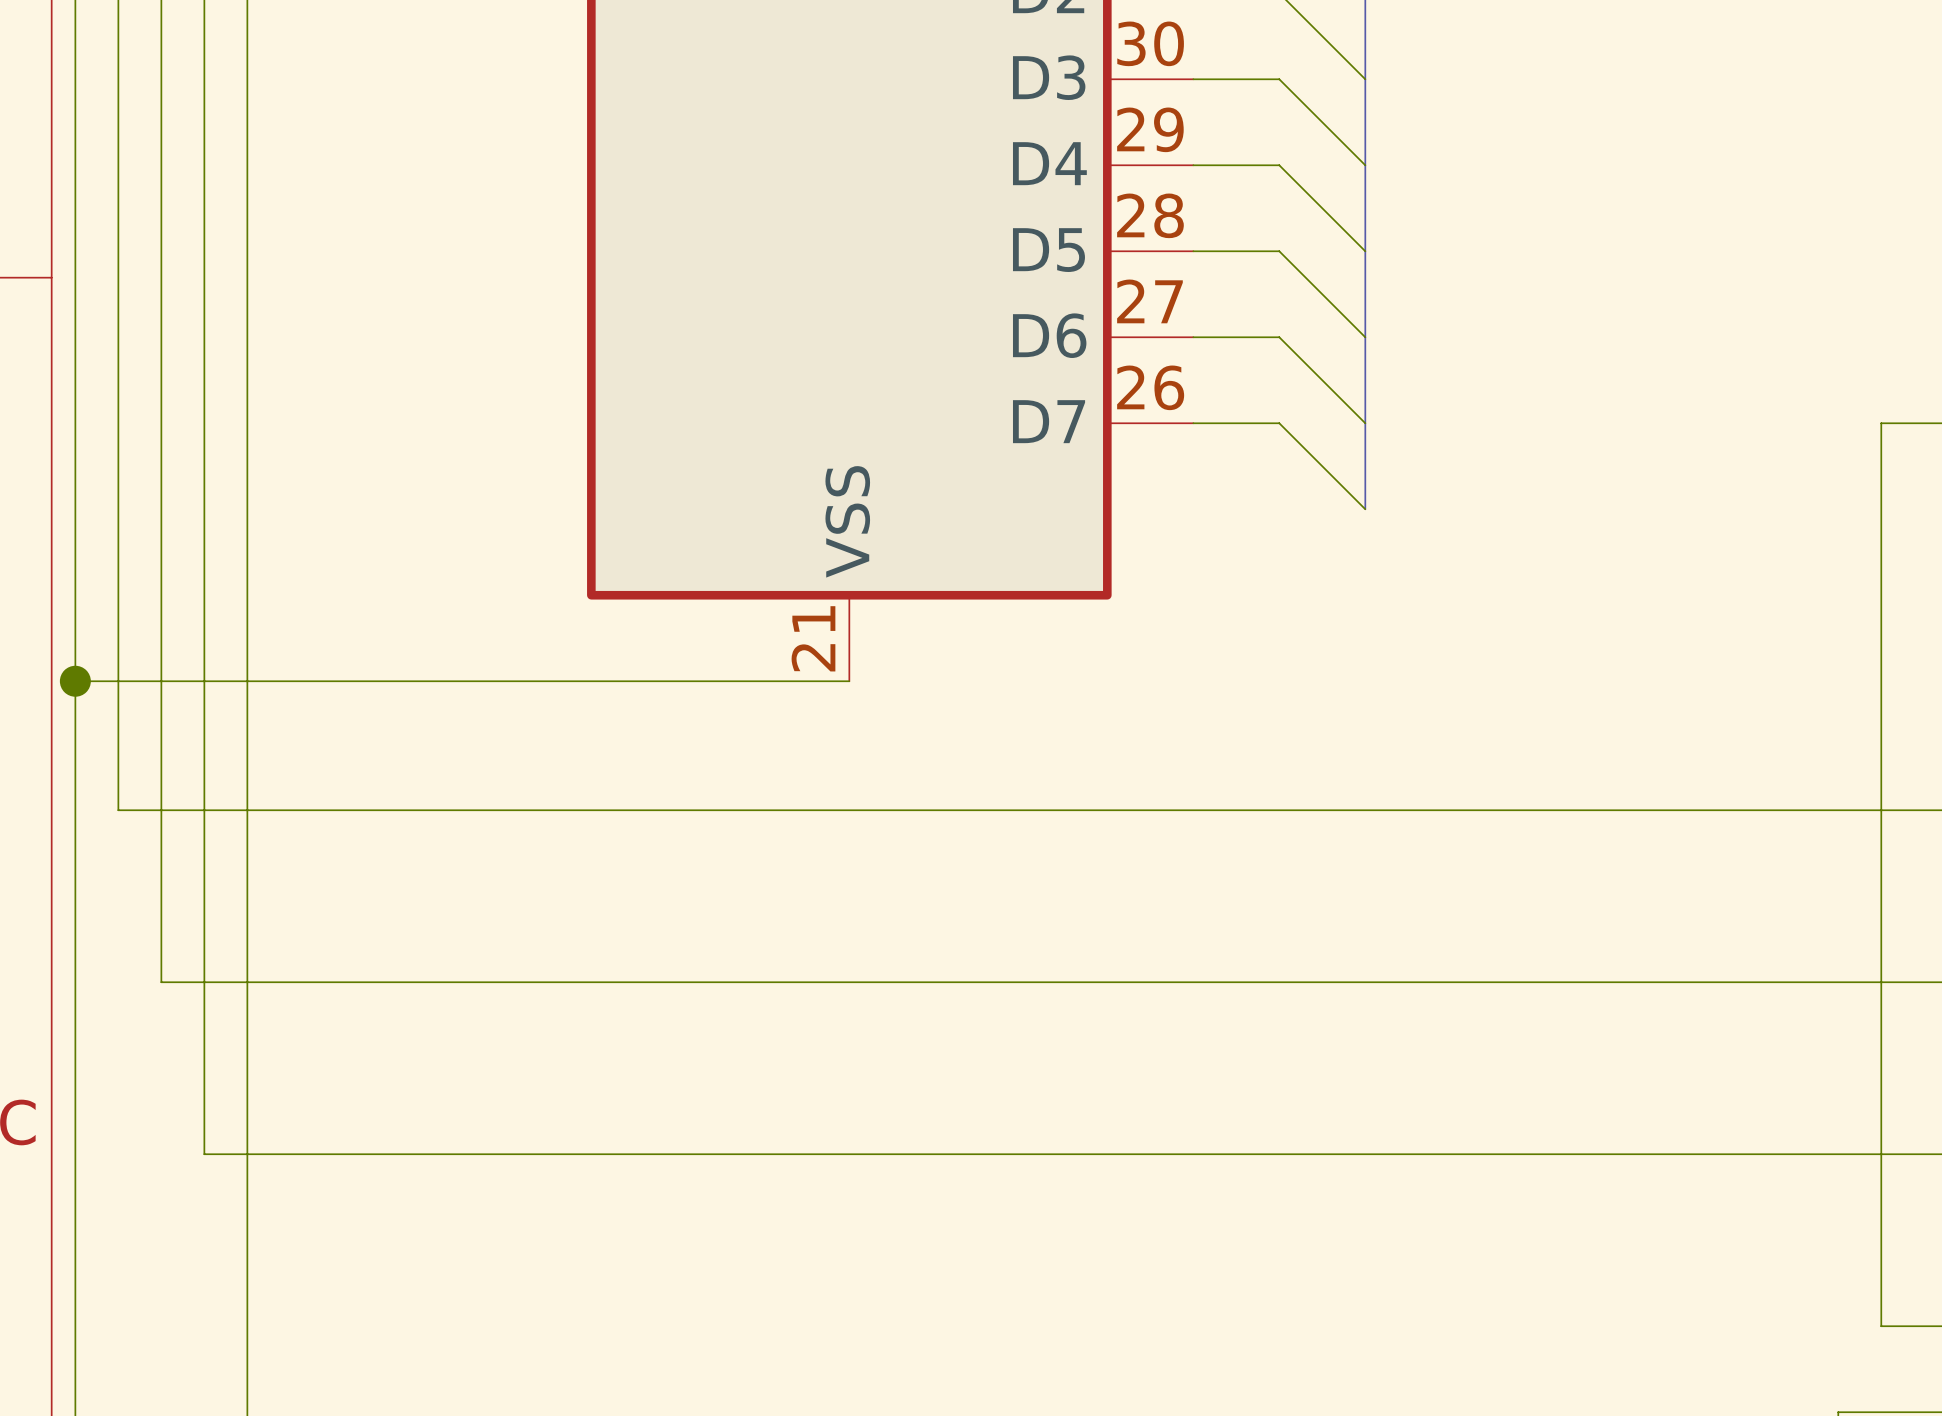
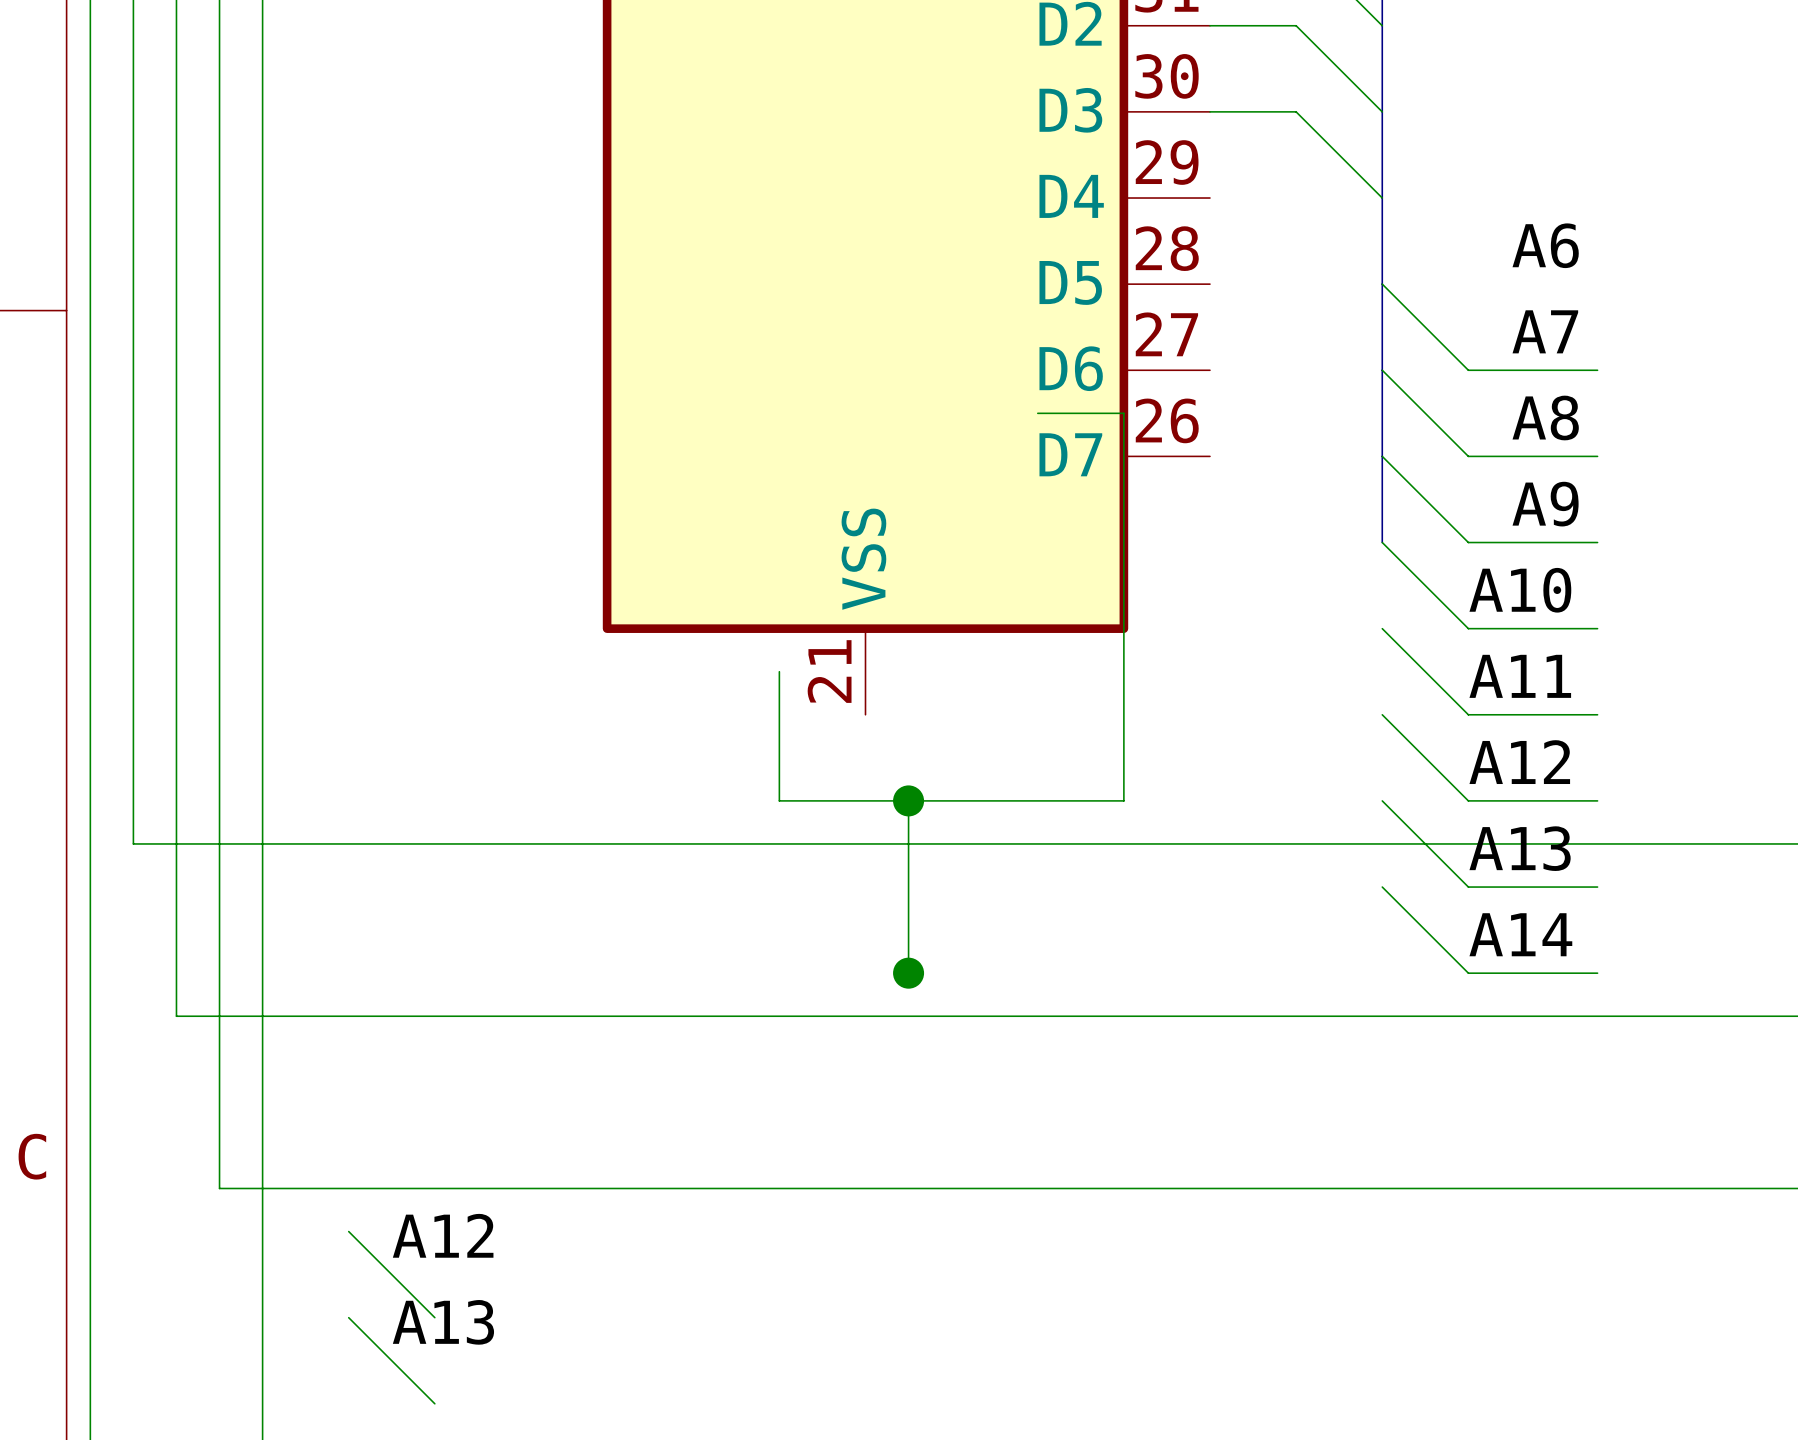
wire: (1193, 165) (1279, 165) (1365, 251) -> (1597, 370) (1468, 370) (1382, 284)
label: none -> A6 (1545, 245)
wire: (1193, 251) (1279, 251) (1365, 337) -> (1597, 456) (1468, 456) (1382, 370)
label: none -> A7 (1545, 331)
wire: (1193, 337) (1279, 337) (1365, 423) -> (1597, 542) (1468, 542) (1382, 456)
wire: none -> (1037, 413) (1123, 413) (1123, 800) (779, 800) (779, 671)
label: none -> A8 (1545, 418)
wire: (1193, 423) (1279, 423) (1365, 509) -> (1597, 628) (1468, 628) (1382, 542)
label: none -> A9 (1545, 504)
label: none -> A10 (1520, 590)
wire: none -> (1382, 628) (1468, 714) (1597, 714)
label: none -> A11 (1520, 676)
wire: (75, 681) (849, 681) -> none
junction: (75, 681) -> none
wire: none -> (1382, 714) (1468, 800) (1597, 800)
label: none -> A12 (1519, 762)
wire: none -> (908, 800) (908, 973)
junction: none -> (908, 800)
wire: none -> (1382, 800) (1468, 887) (1597, 887)
label: none -> A13 (1520, 848)
wire: none -> (1382, 887) (1468, 973) (1597, 973)
label: none -> A14 (1520, 934)
junction: none -> (908, 973)
wire: none -> (348, 1231) (434, 1317)
label: none -> A12 (443, 1235)
wire: none -> (348, 1317) (434, 1403)
label: none -> A13 (443, 1322)

